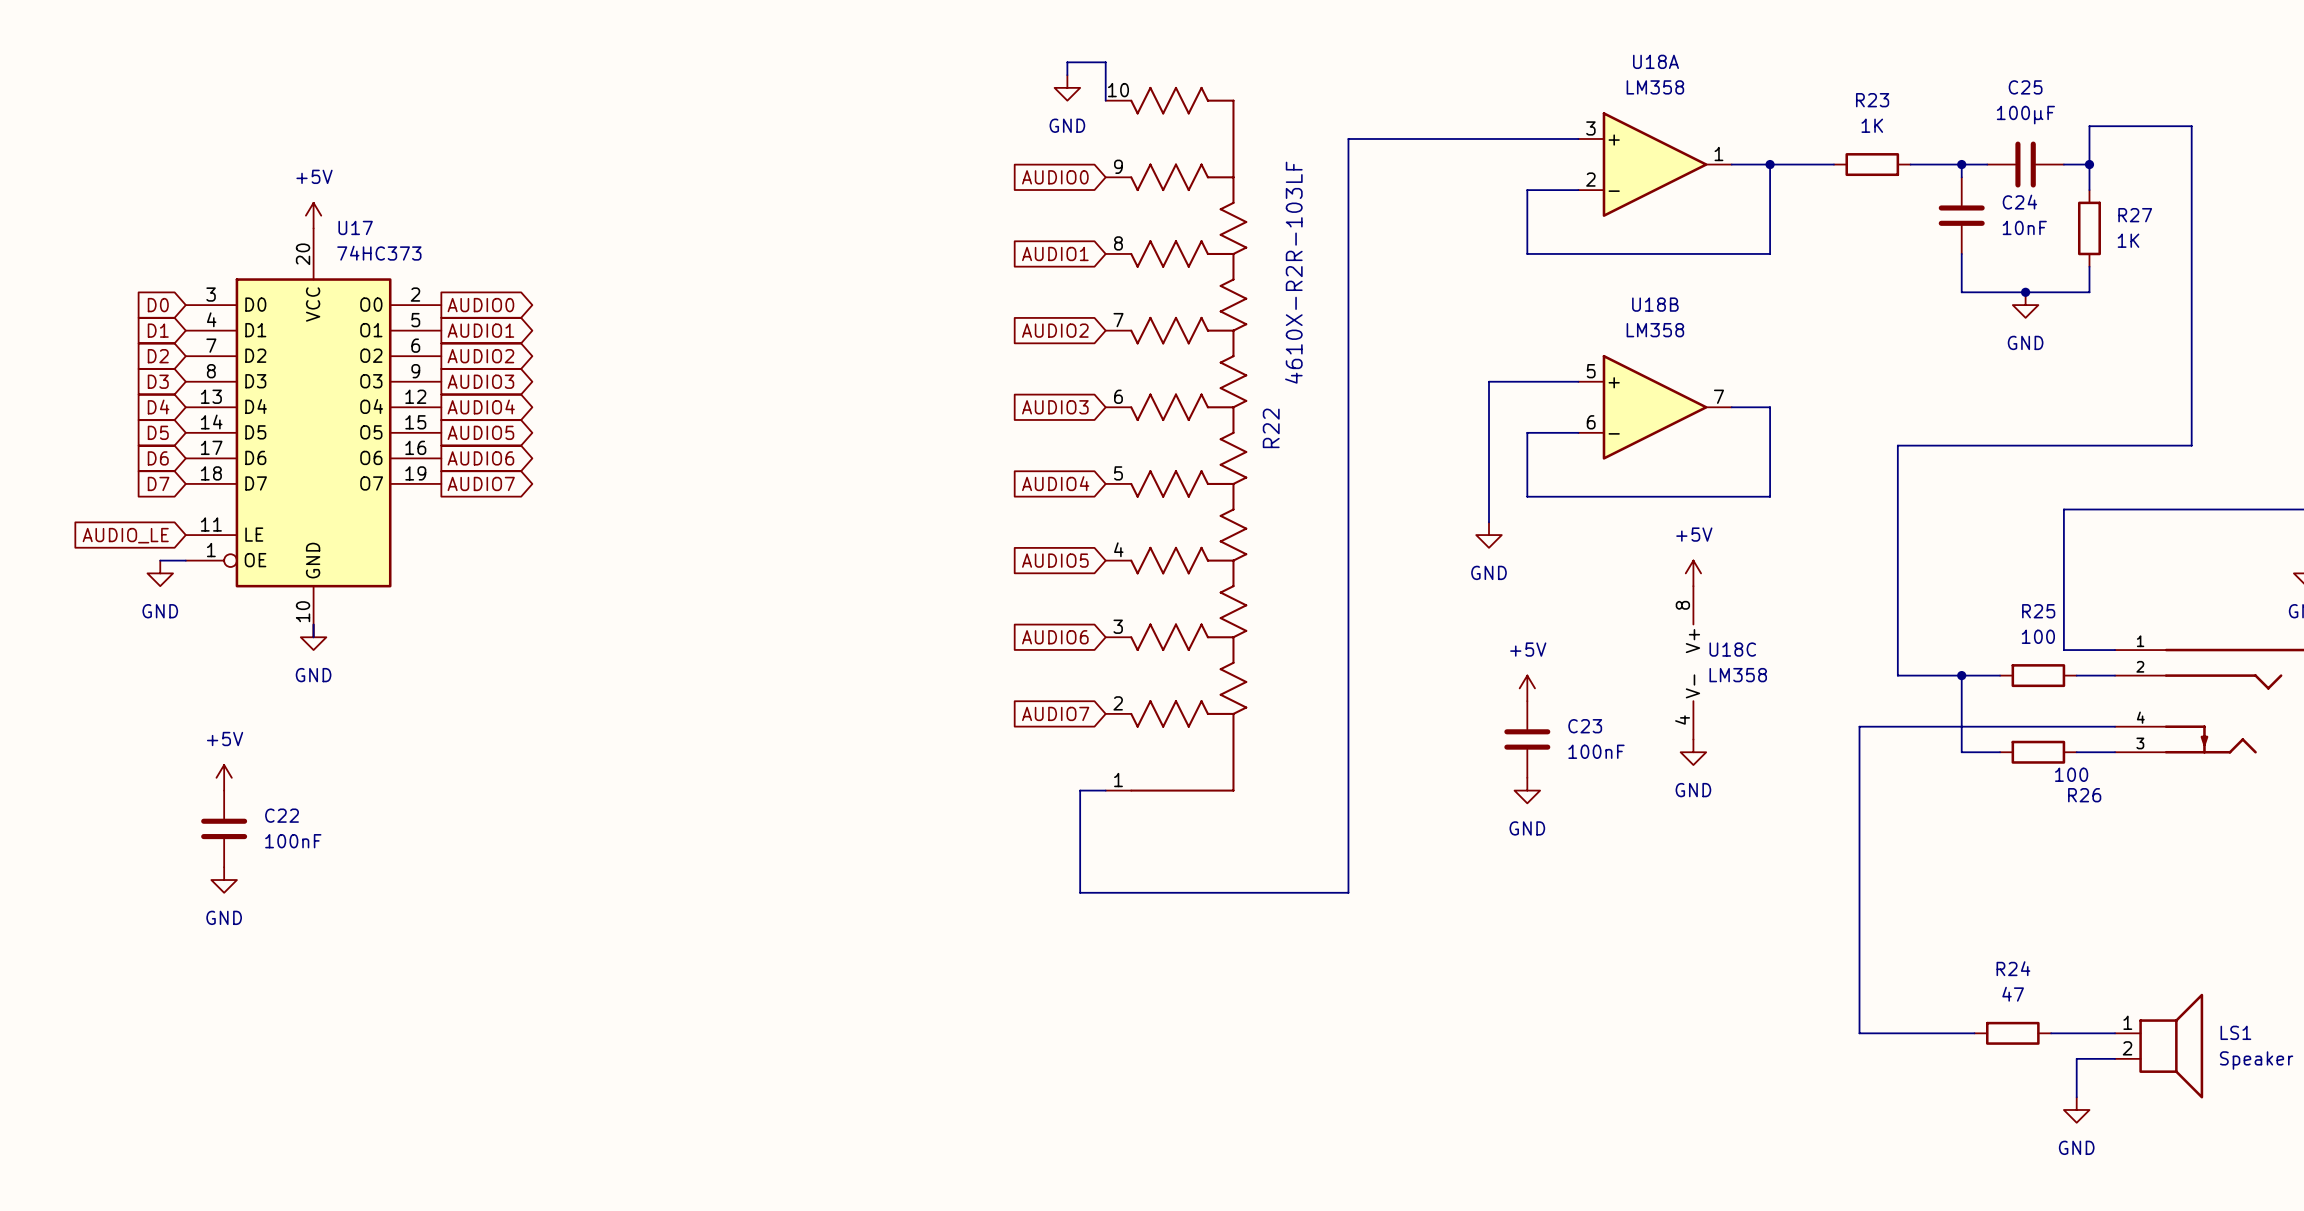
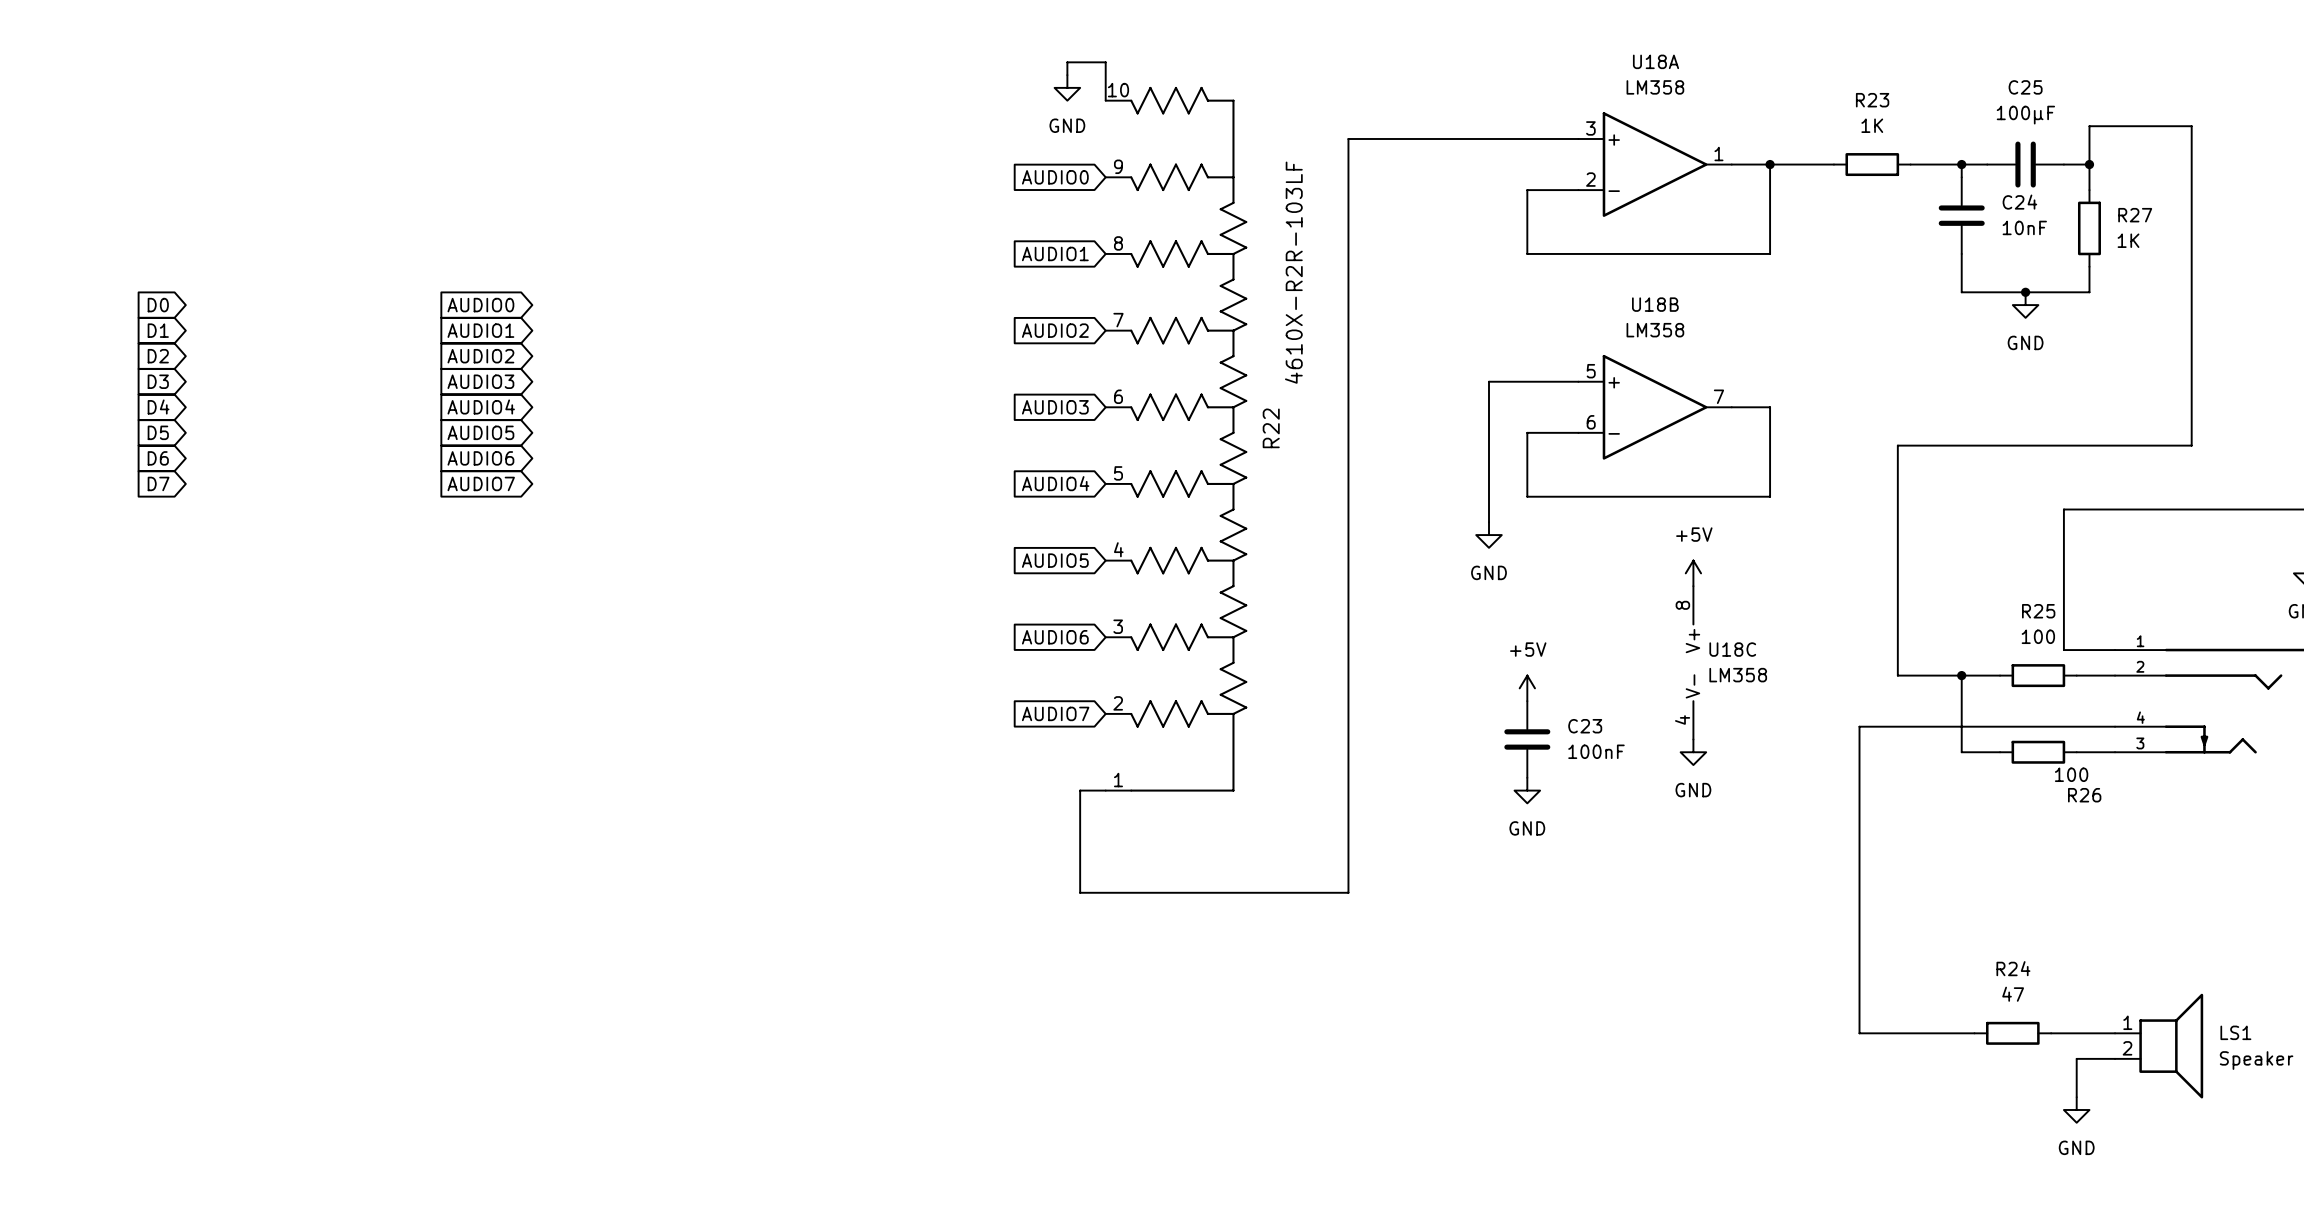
power symbol: +5V (313, 215) -> none
U17: 74HC373 (313, 432) -> none
global label: AUDIO_LE (125, 535) -> none
wire: (160, 560) (185, 560) -> none
power symbol: GND (160, 573) -> none
wire: (313, 624) (313, 637) -> none
power symbol: GND (313, 637) -> none
power symbol: +5V (224, 777) -> none
C22: 100nF (224, 828) -> none
power symbol: GND (224, 880) -> none

